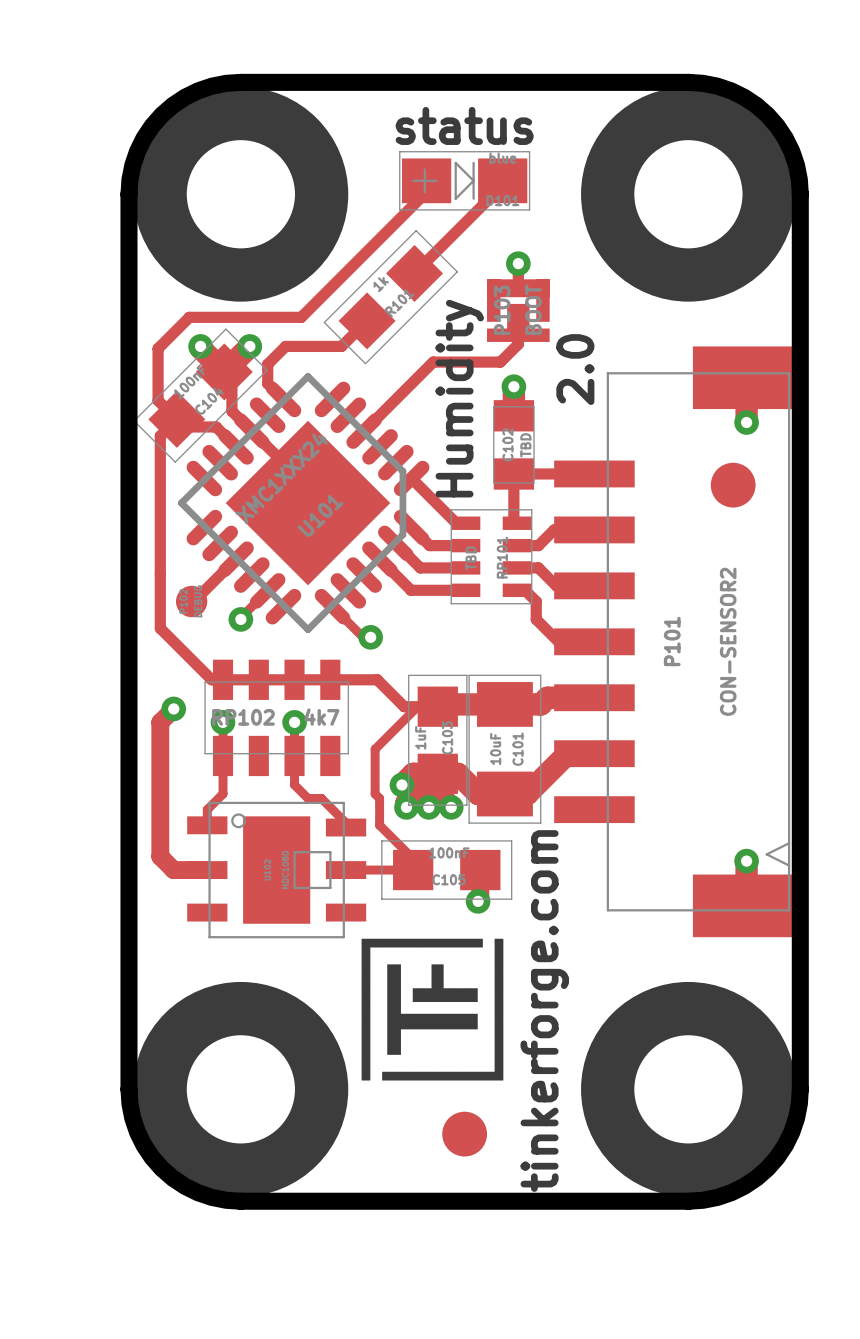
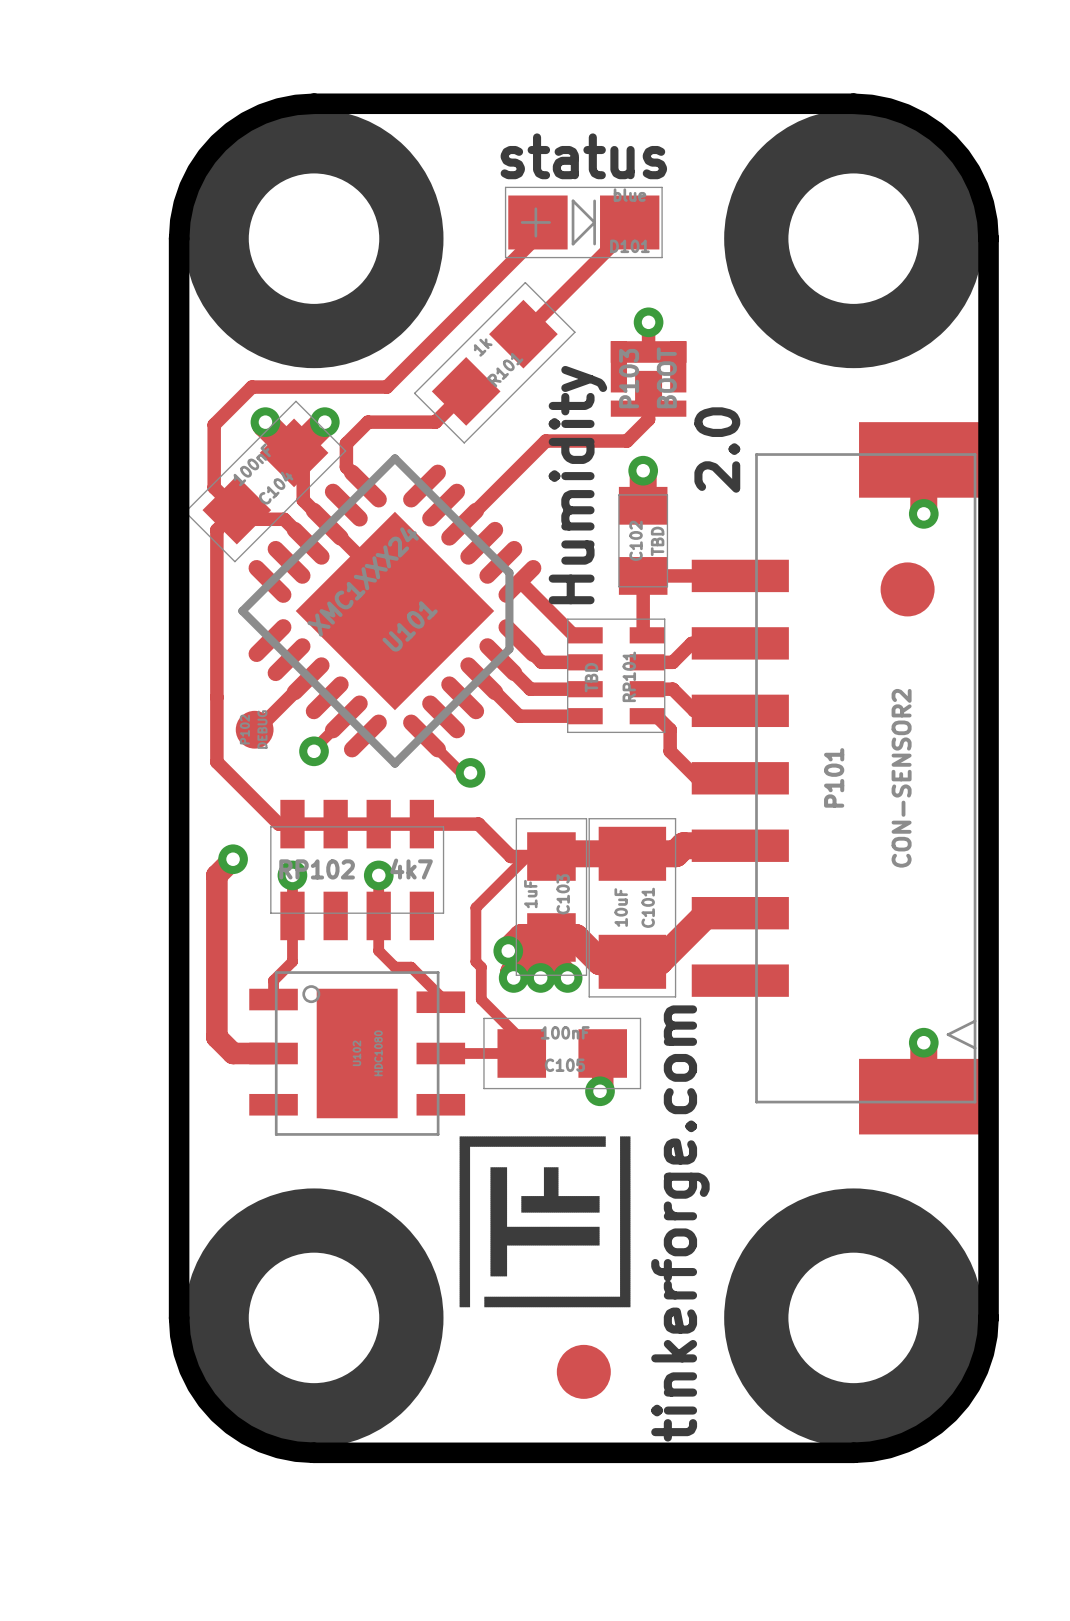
part footprint: [187, 801, 367, 939] -> [249, 971, 466, 1136]

